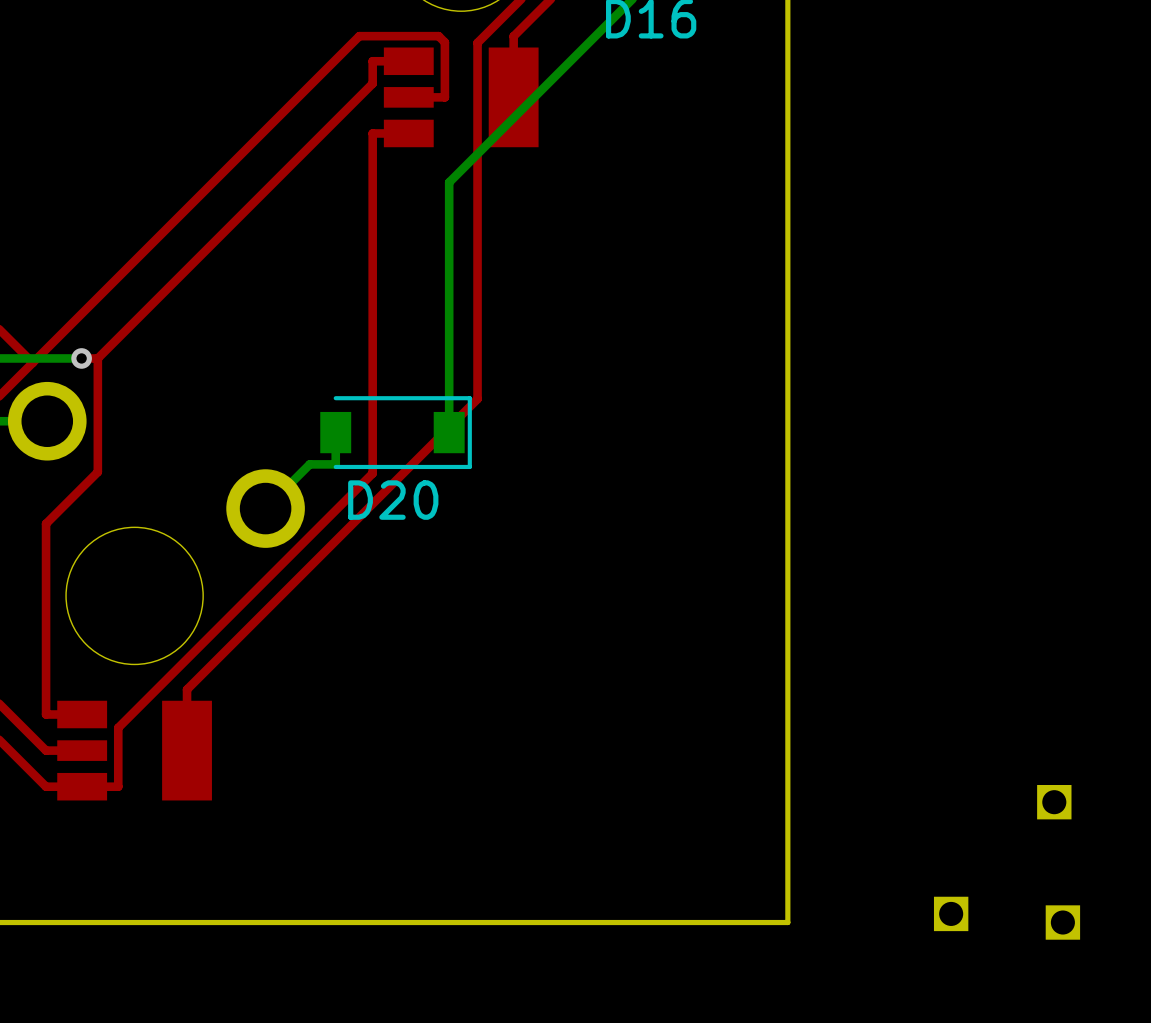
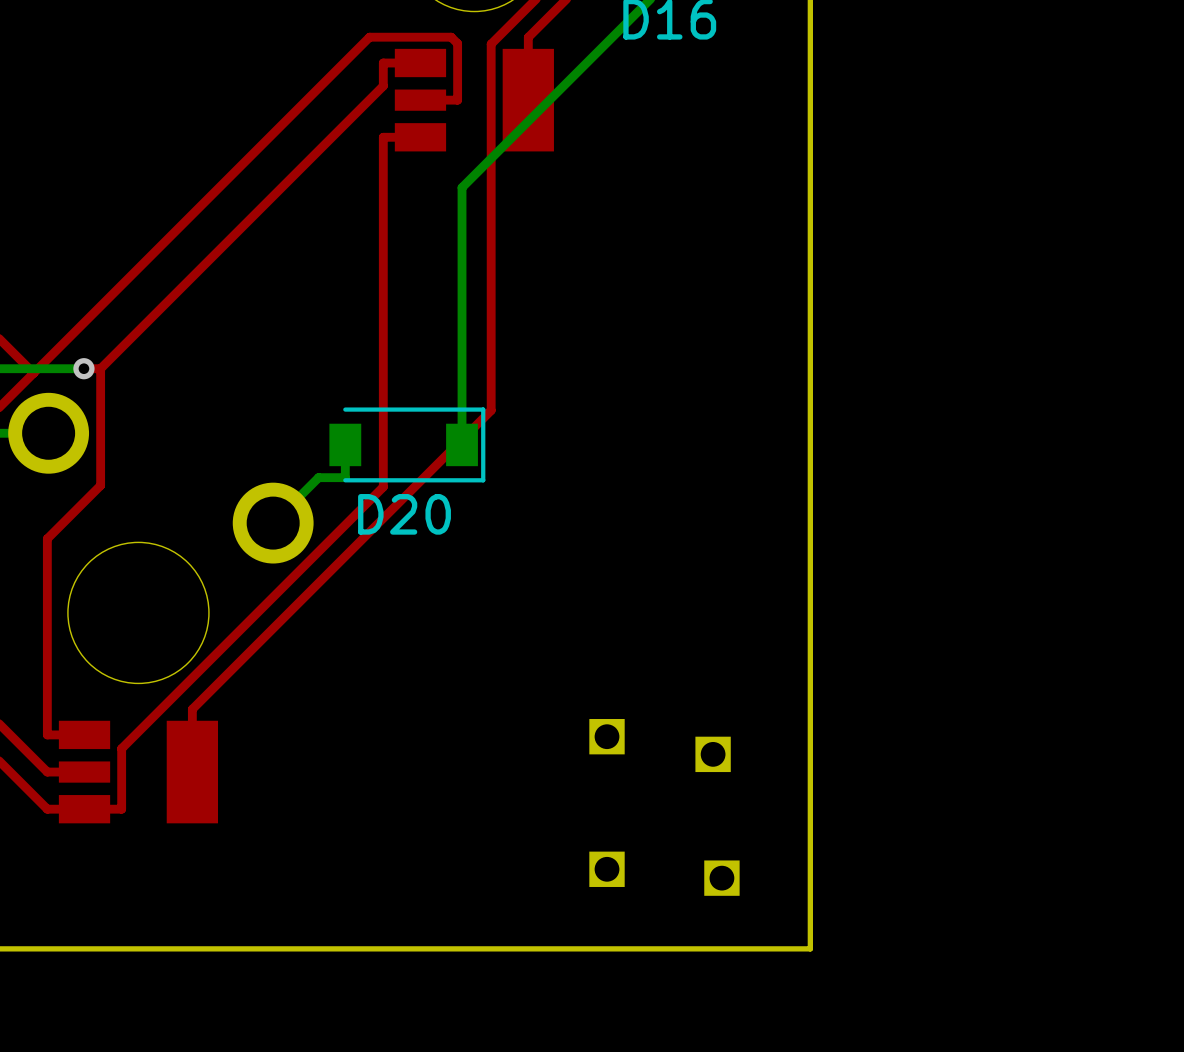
part: none -> (607, 736)
part: none -> (713, 754)
part: (1054, 802) -> none
part: none -> (607, 869)
part: none -> (721, 878)
part: (951, 913) -> none
part: (1062, 922) -> none

